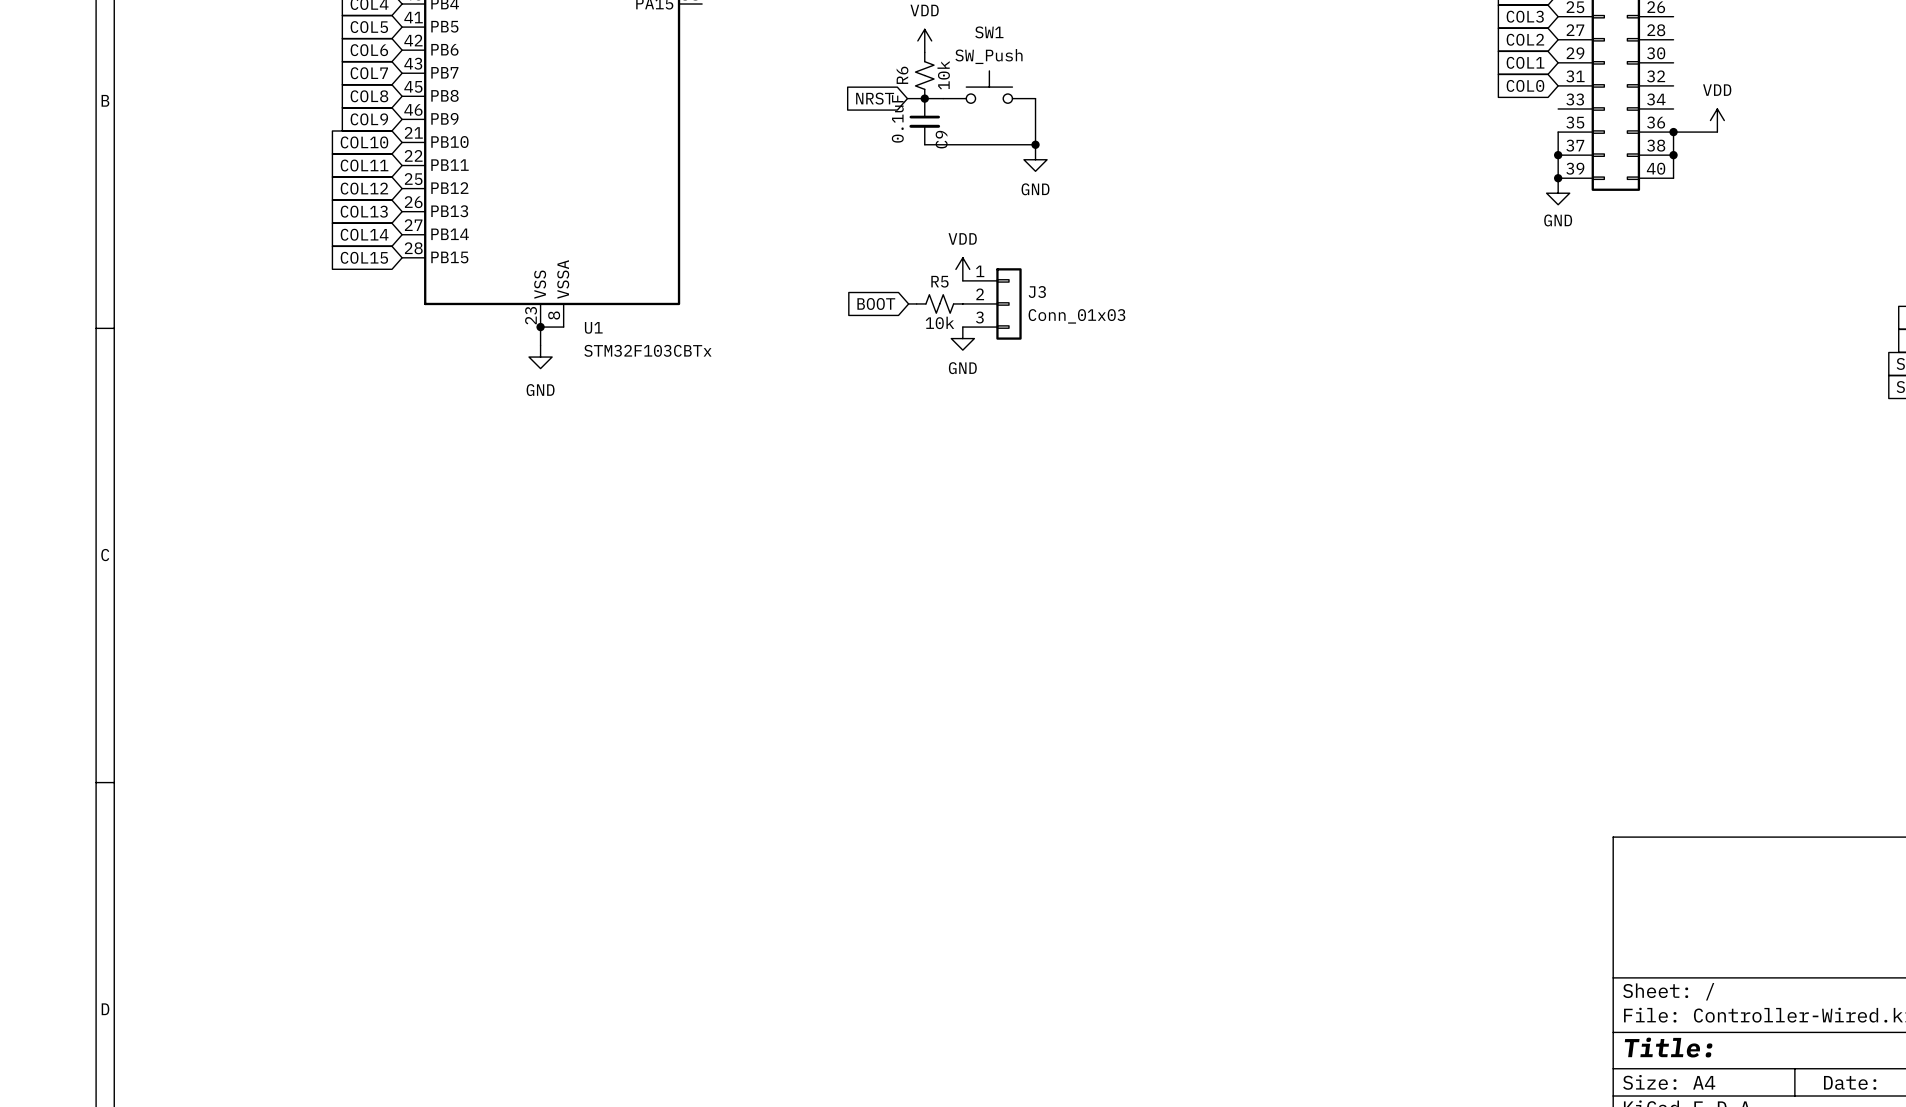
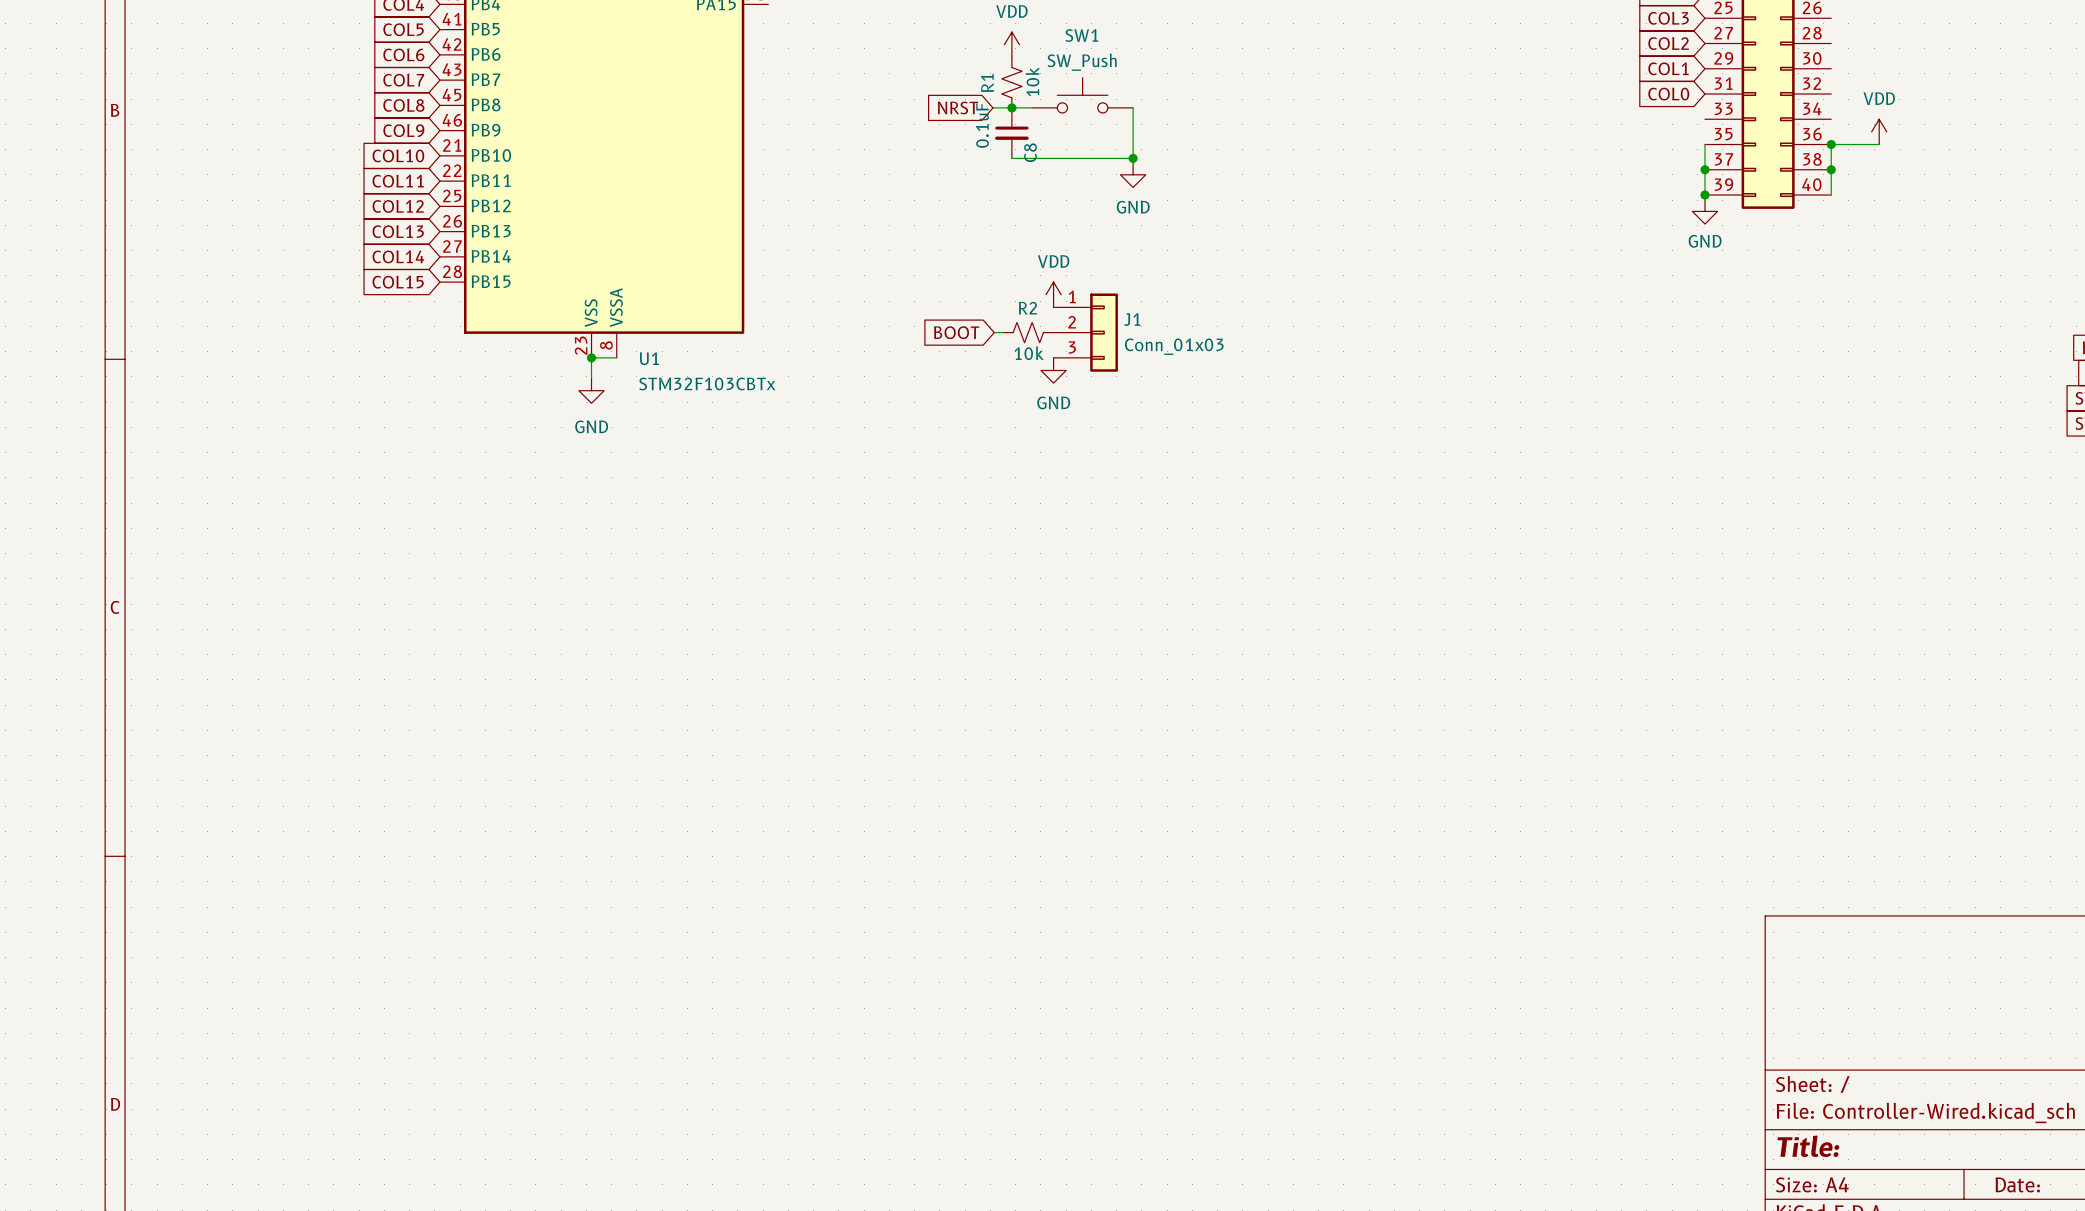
R6 name: R6 (902, 75) -> R1 (987, 83)
C9 name: C9 (941, 139) -> C8 (1030, 152)
R5 name: R5 (939, 281) -> R2 (1027, 308)
J3 name: J3 (1037, 292) -> J1 (1132, 319)

